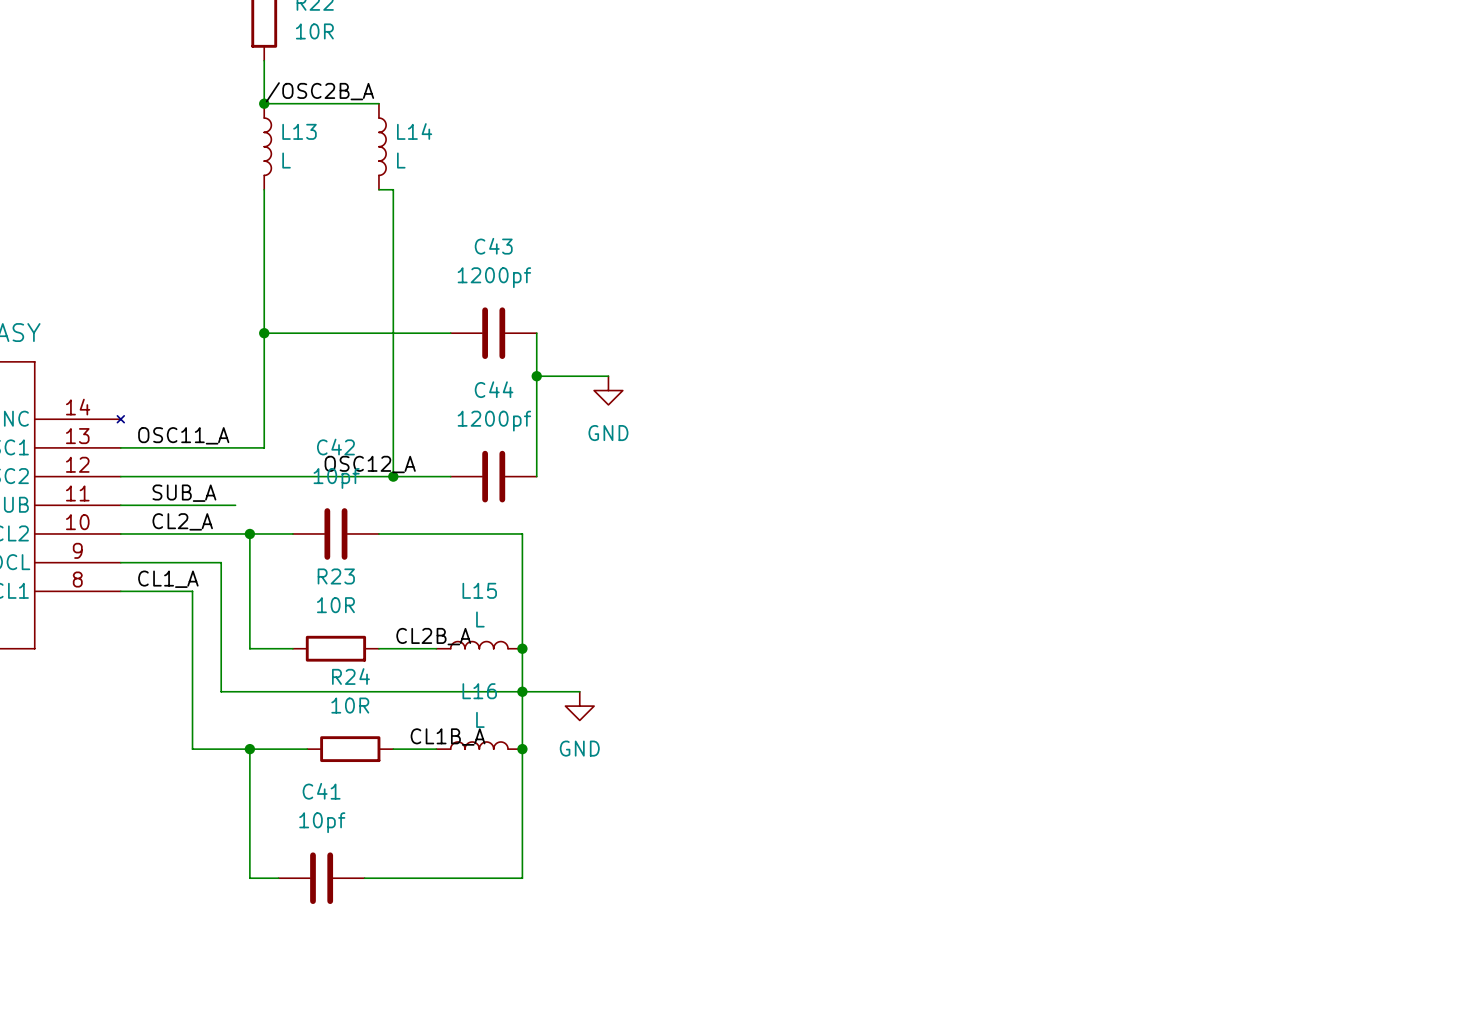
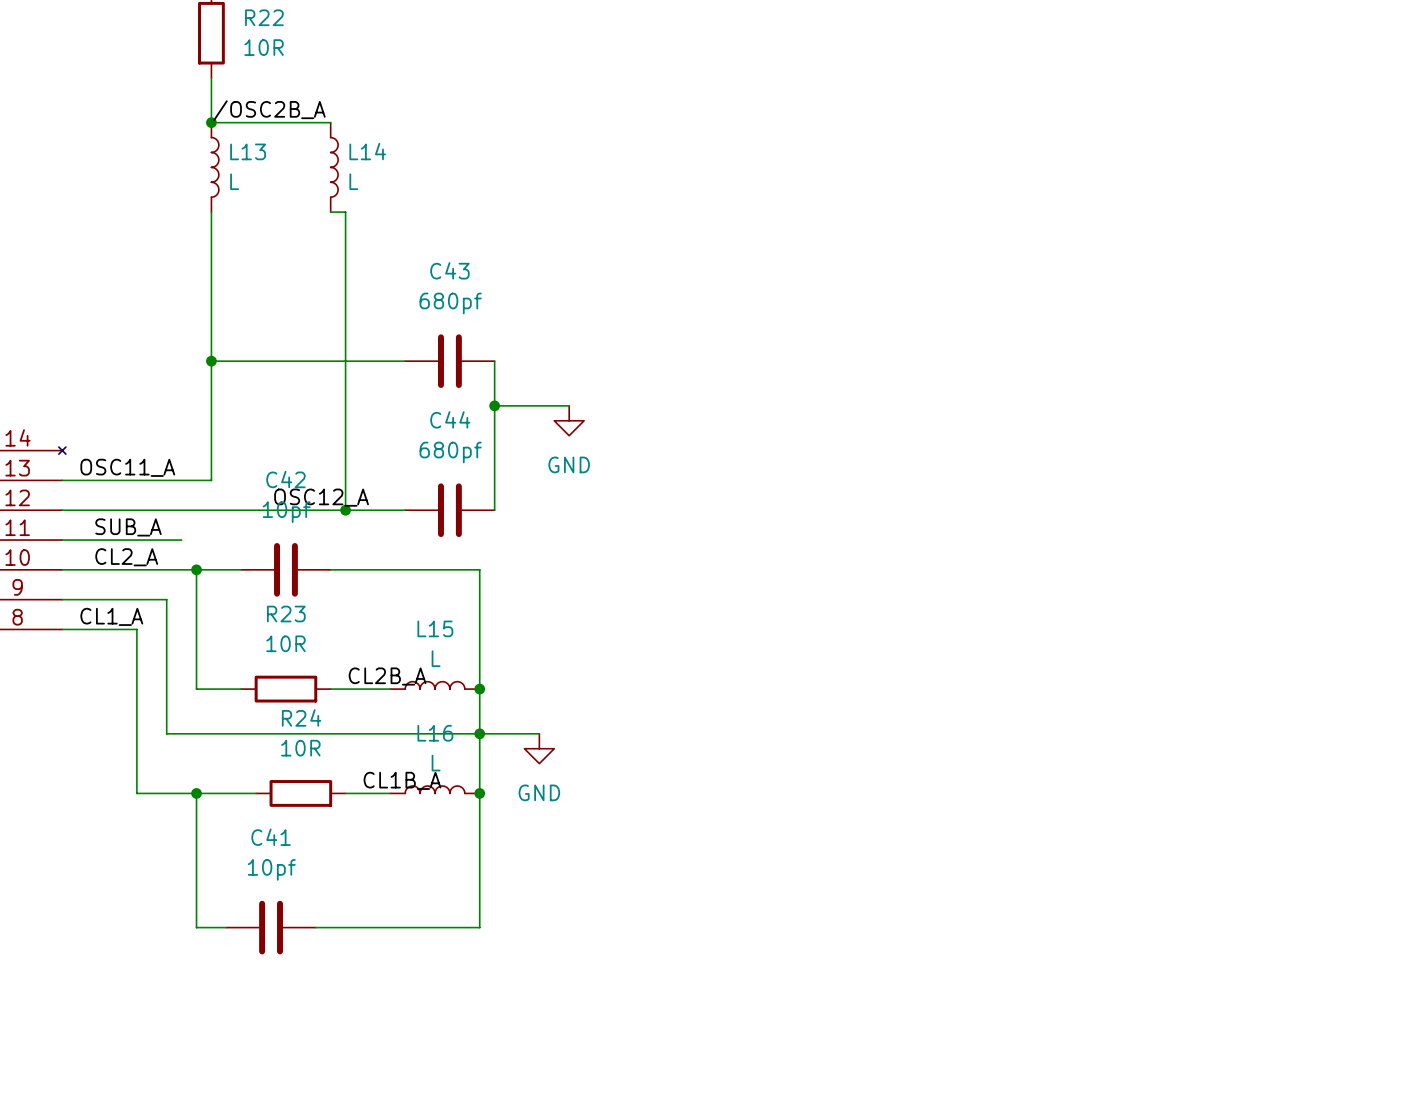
C43 value: 1200pf (494, 277) -> 680pf (450, 303)
C44 value: 1200pf (494, 421) -> 680pf (450, 452)

